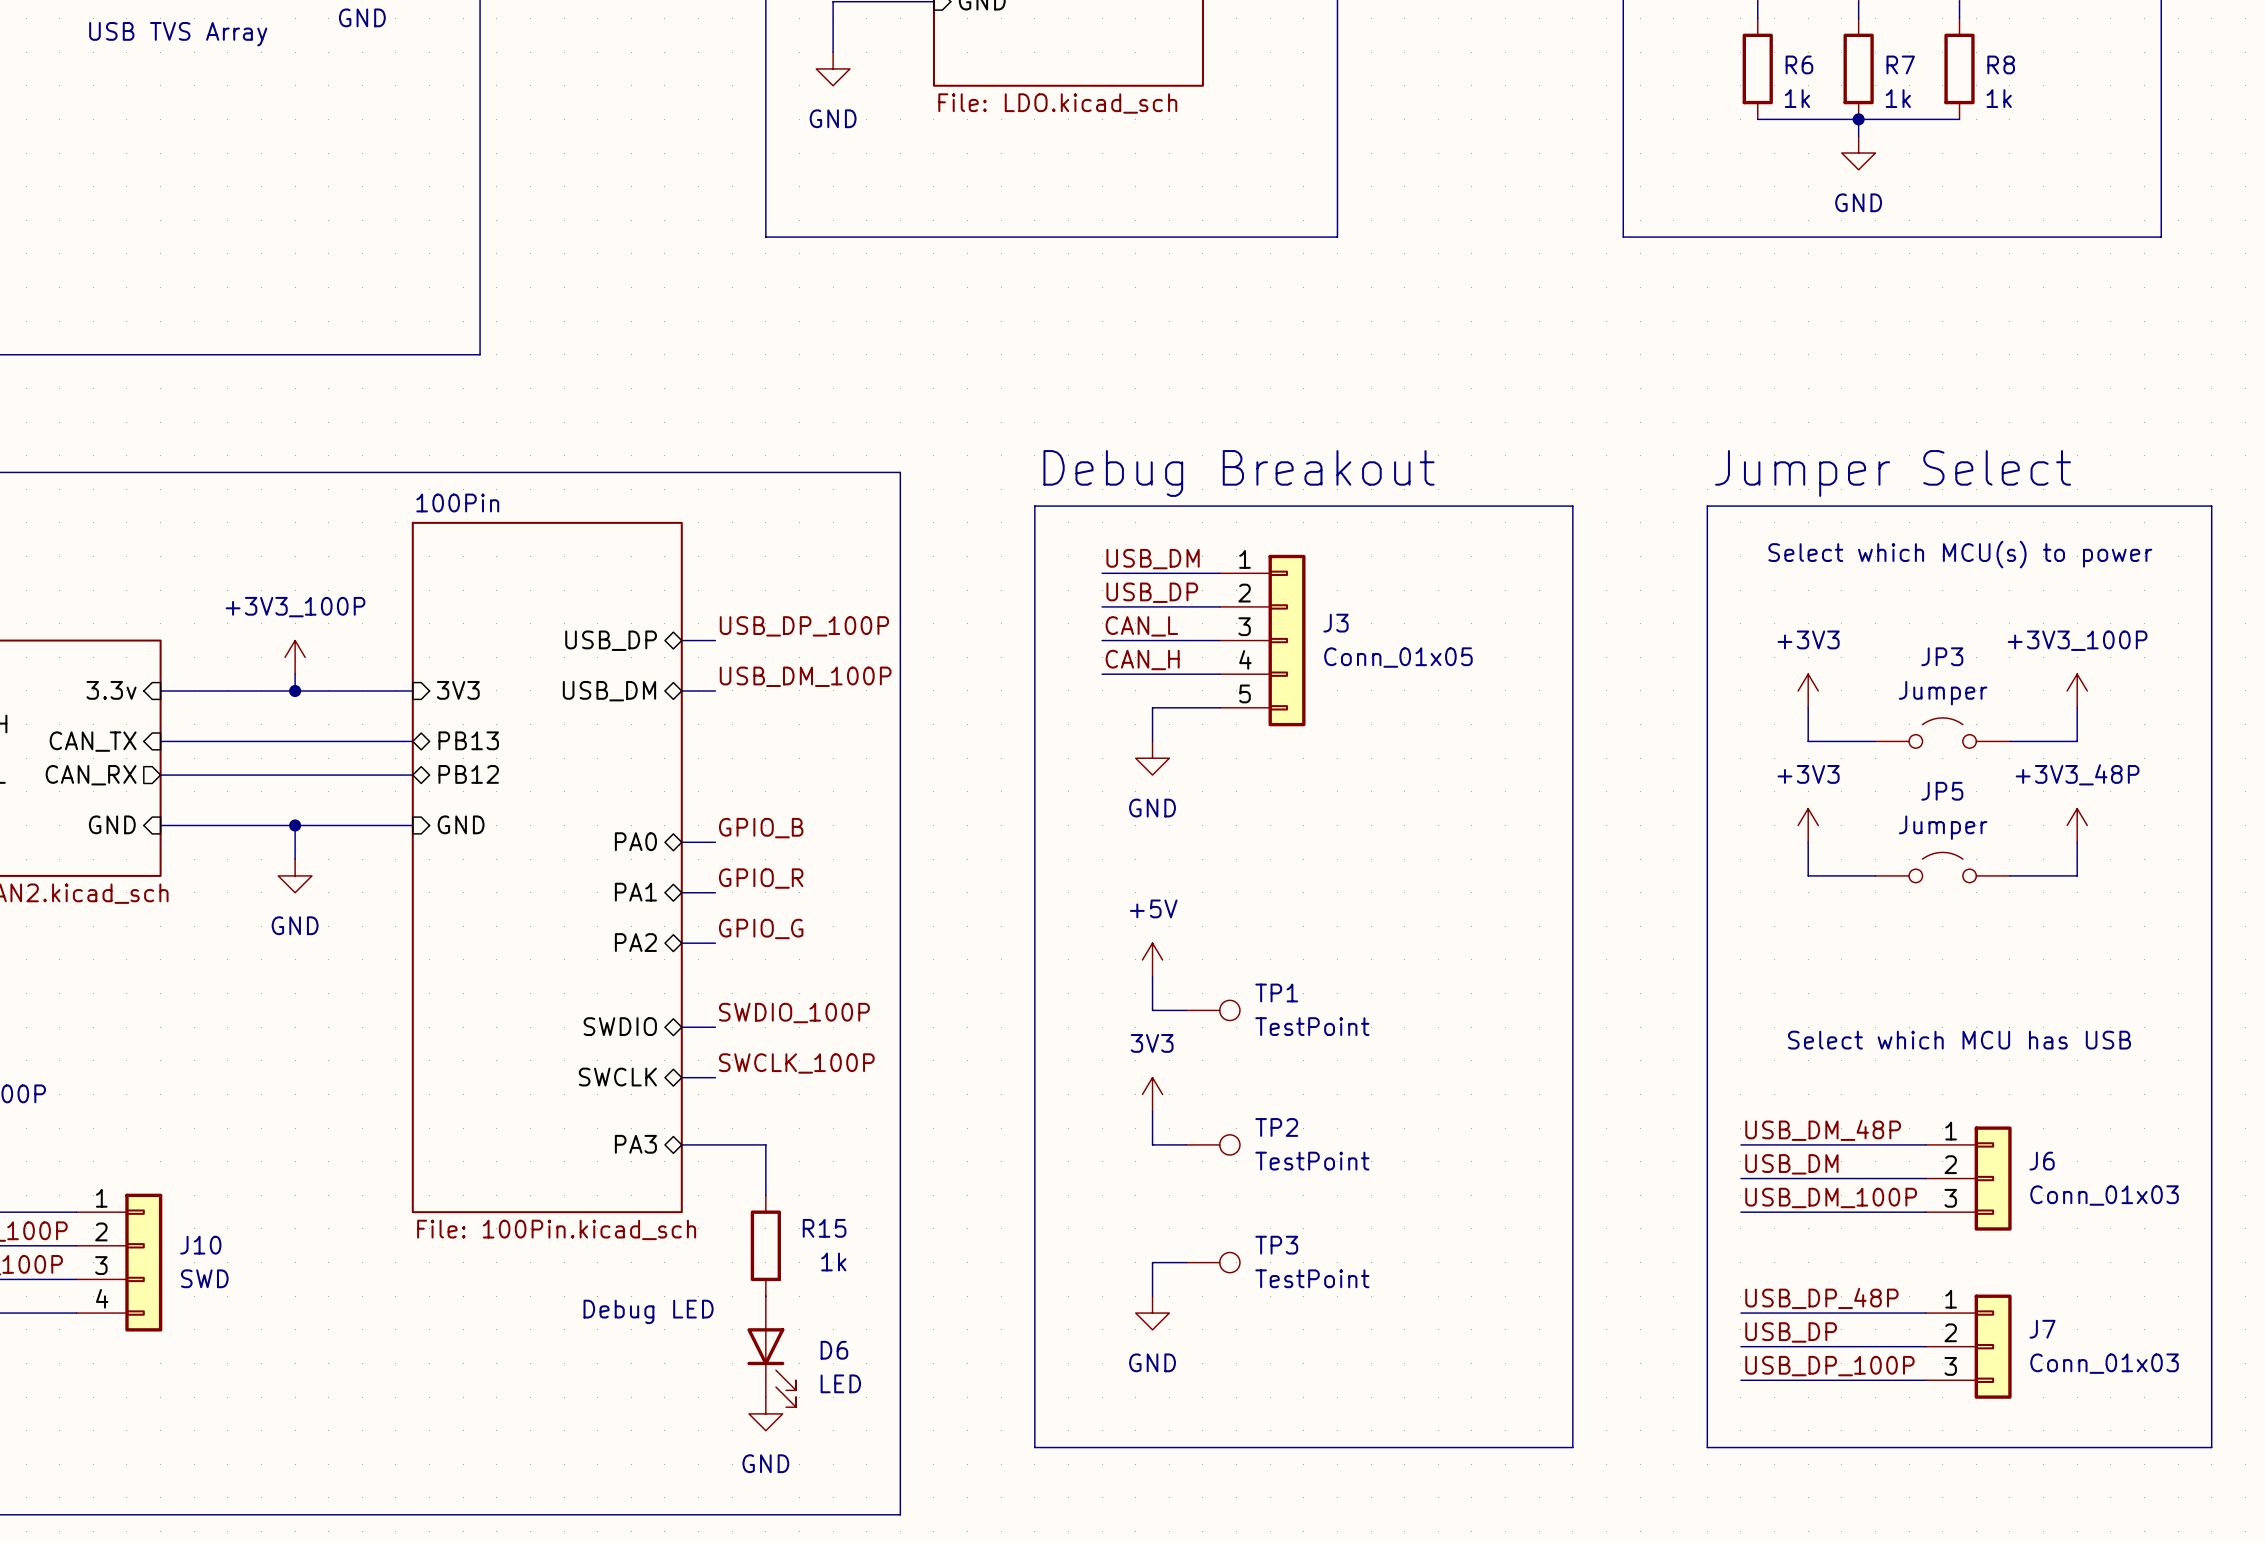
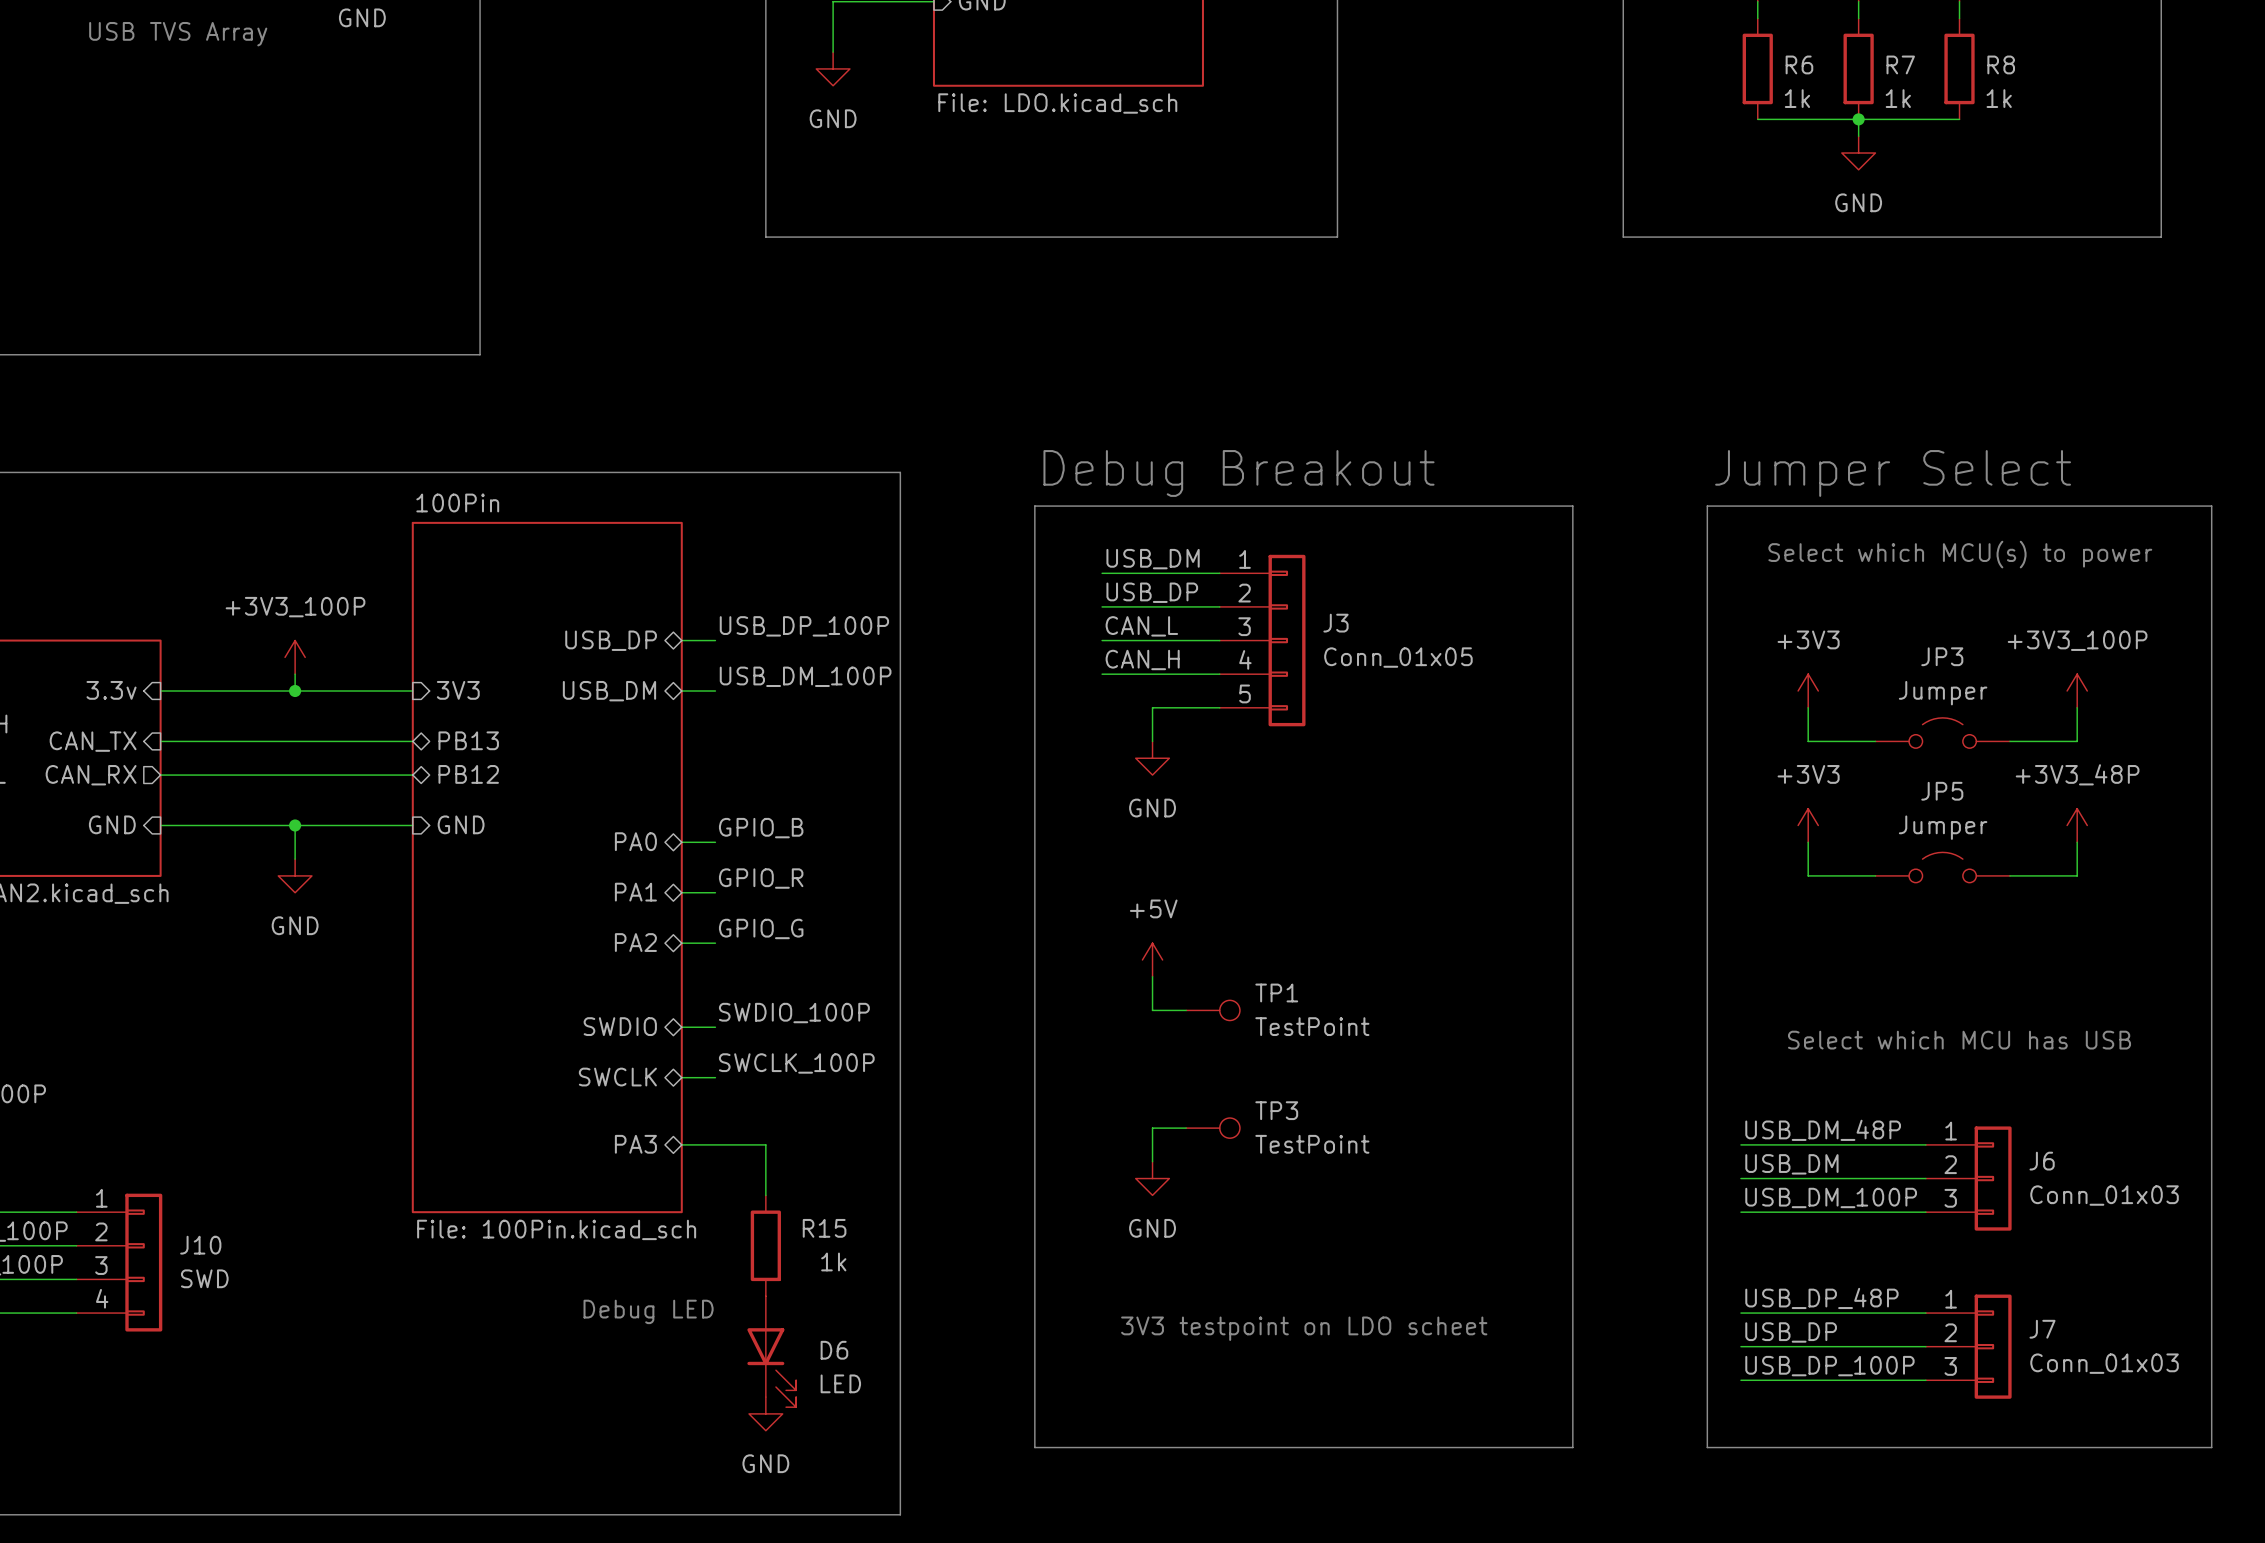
power symbol: 3V3 (1152, 1094) -> none
wire: (1152, 1111) (1152, 1128) -> (1186, 1128) (1152, 1128)
wire: (1152, 1144) (1186, 1144) -> (1152, 1144) (1152, 1161)
TP2: TestPoint (1213, 1144) -> none
wire: (1186, 1262) (1152, 1262) (1152, 1296) -> none
TP3 position: (1213, 1262) -> (1213, 1128)
power symbol position: GND (1152, 1313) -> GND (1152, 1178)
text: none -> 3V3 testpoint on LDO scheet (1304, 1328)

